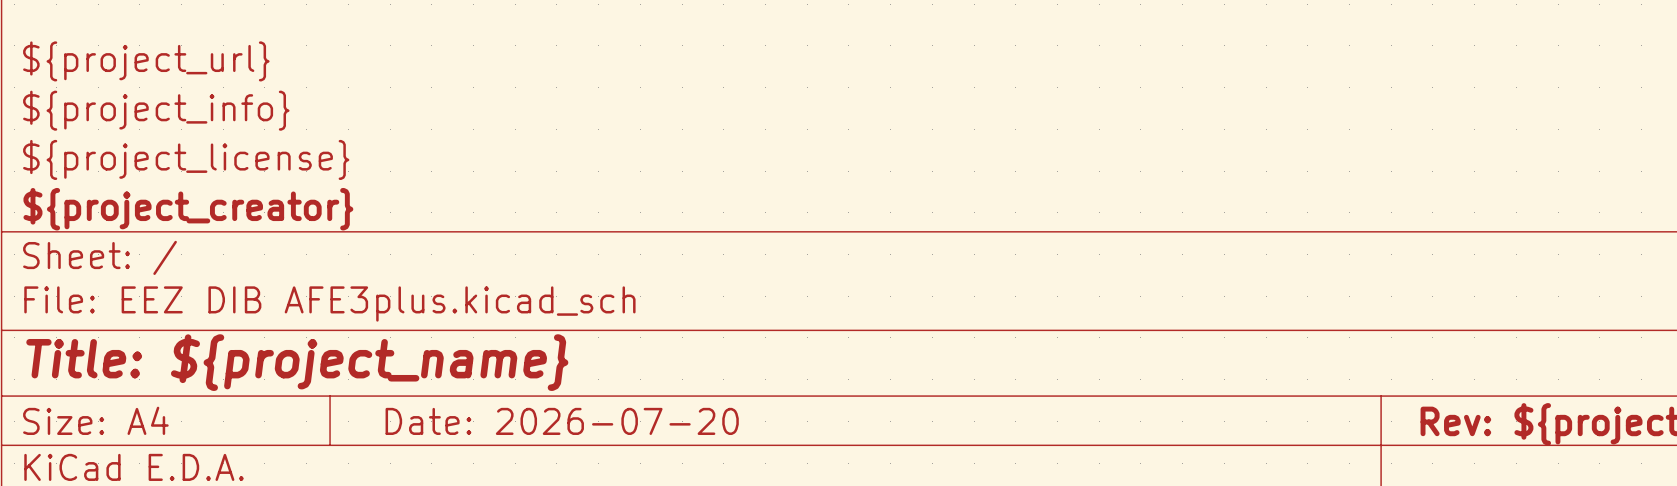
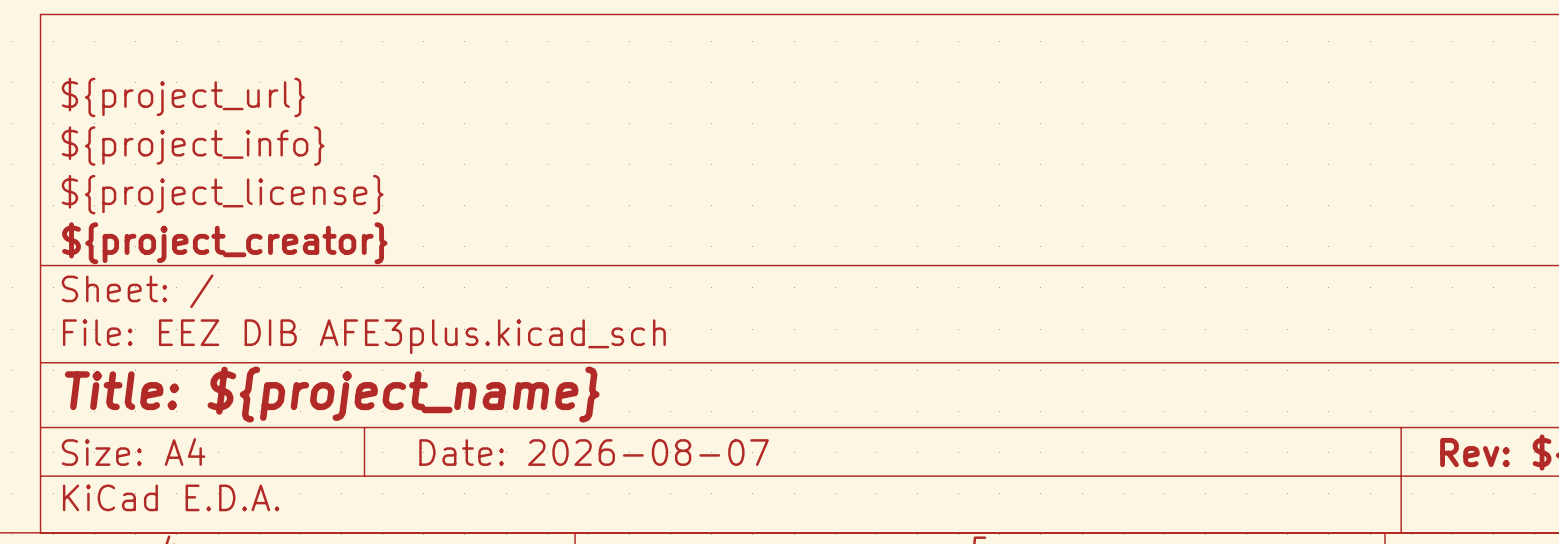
title block: Date: 2026-07-20 (562, 421) -> Date: 2026-08-07 (594, 452)

